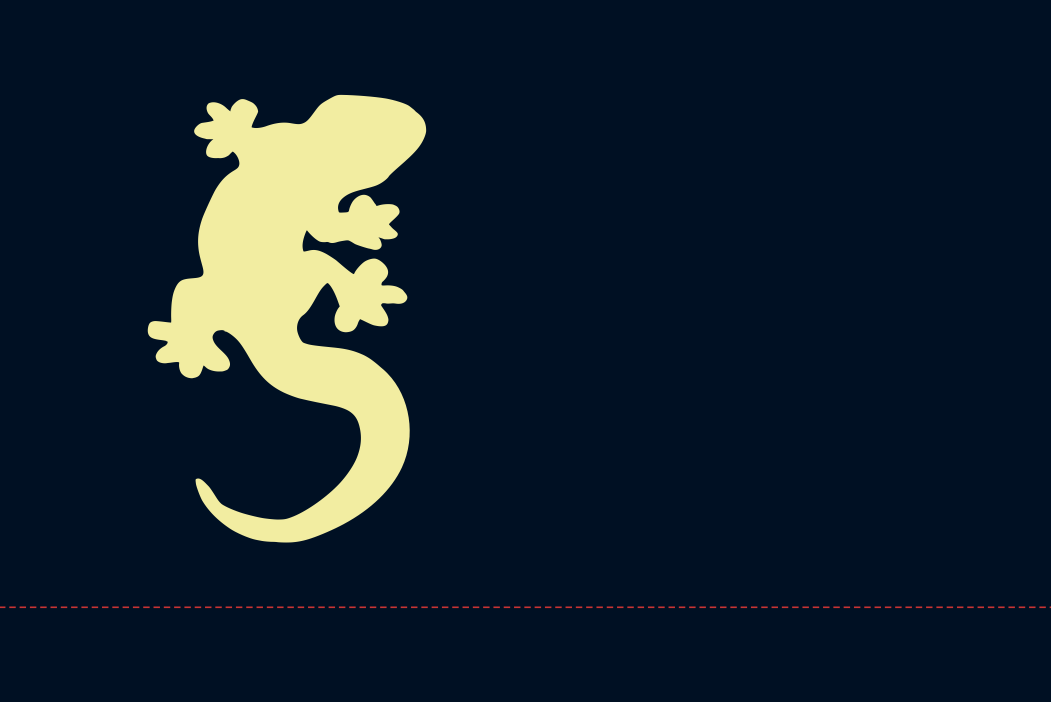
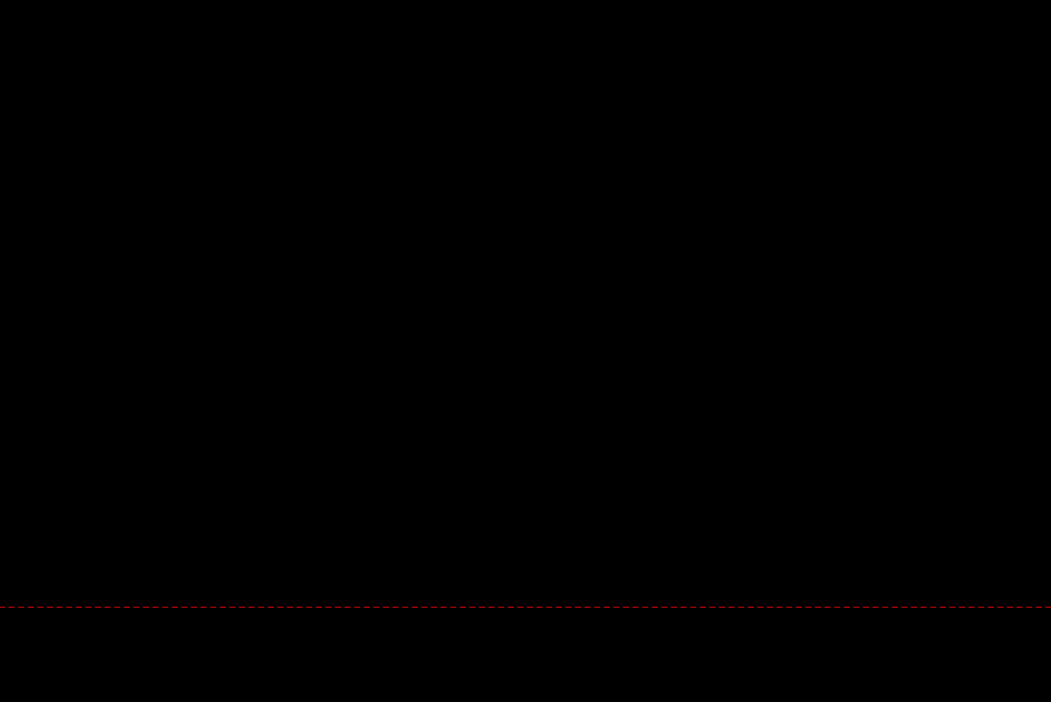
drawing: [147, 94, 427, 543] -> none

